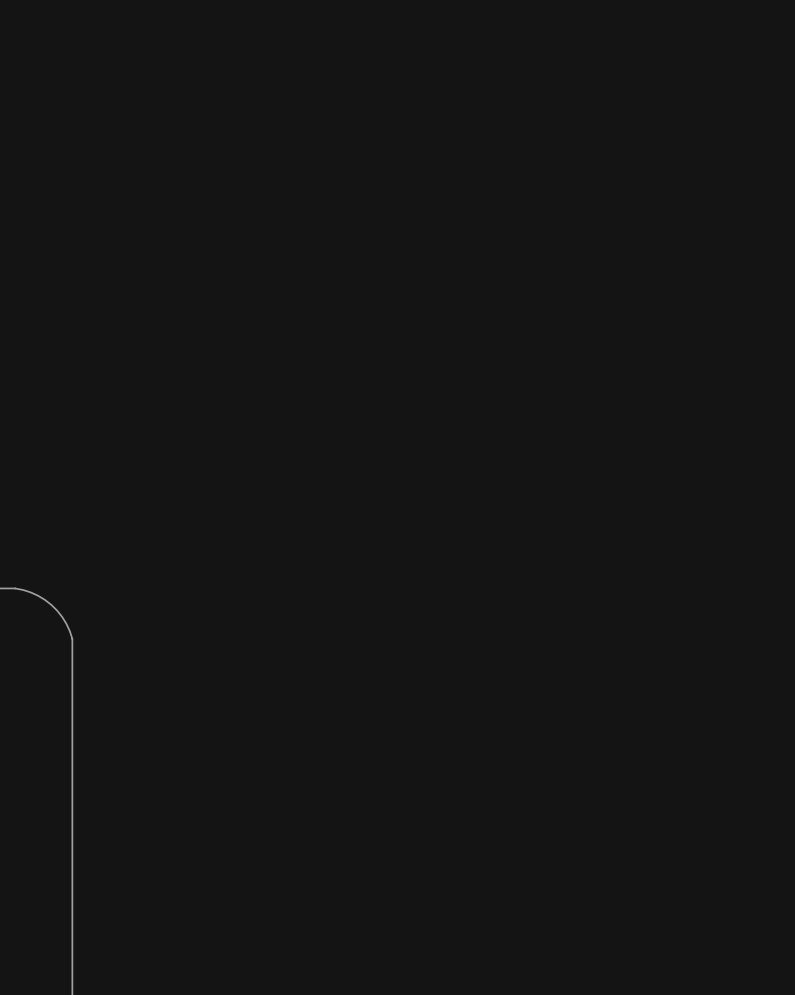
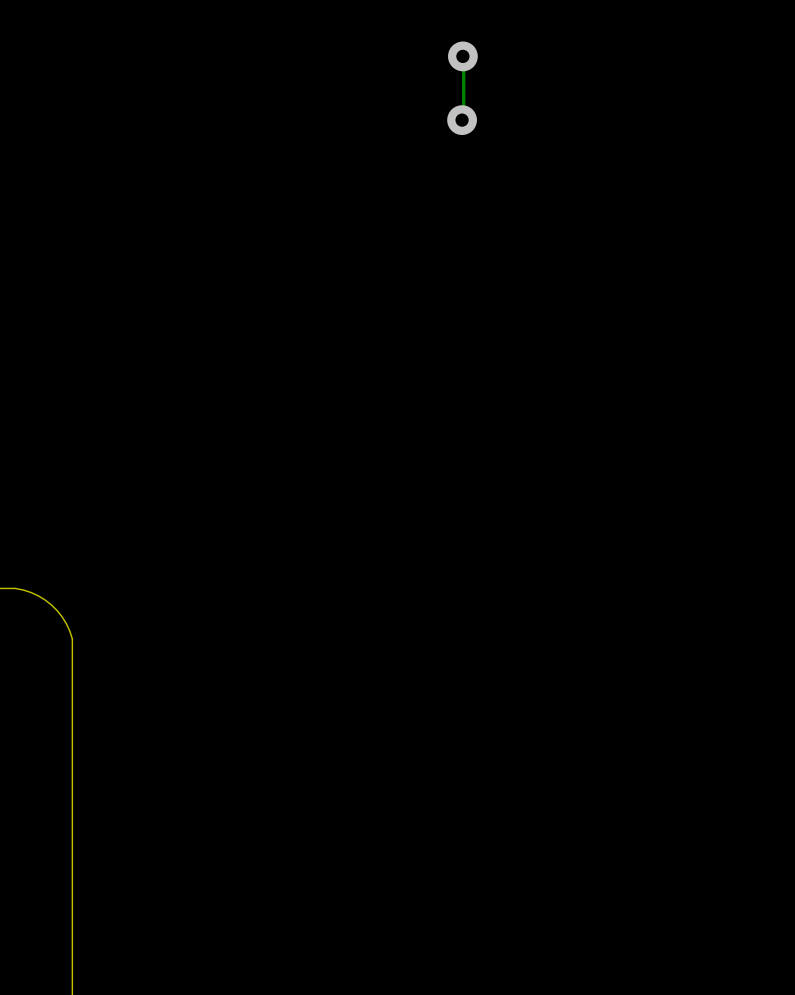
track: none -> (462, 56) (463, 118) (462, 120)
via: none -> (462, 56)
via: none -> (462, 120)

